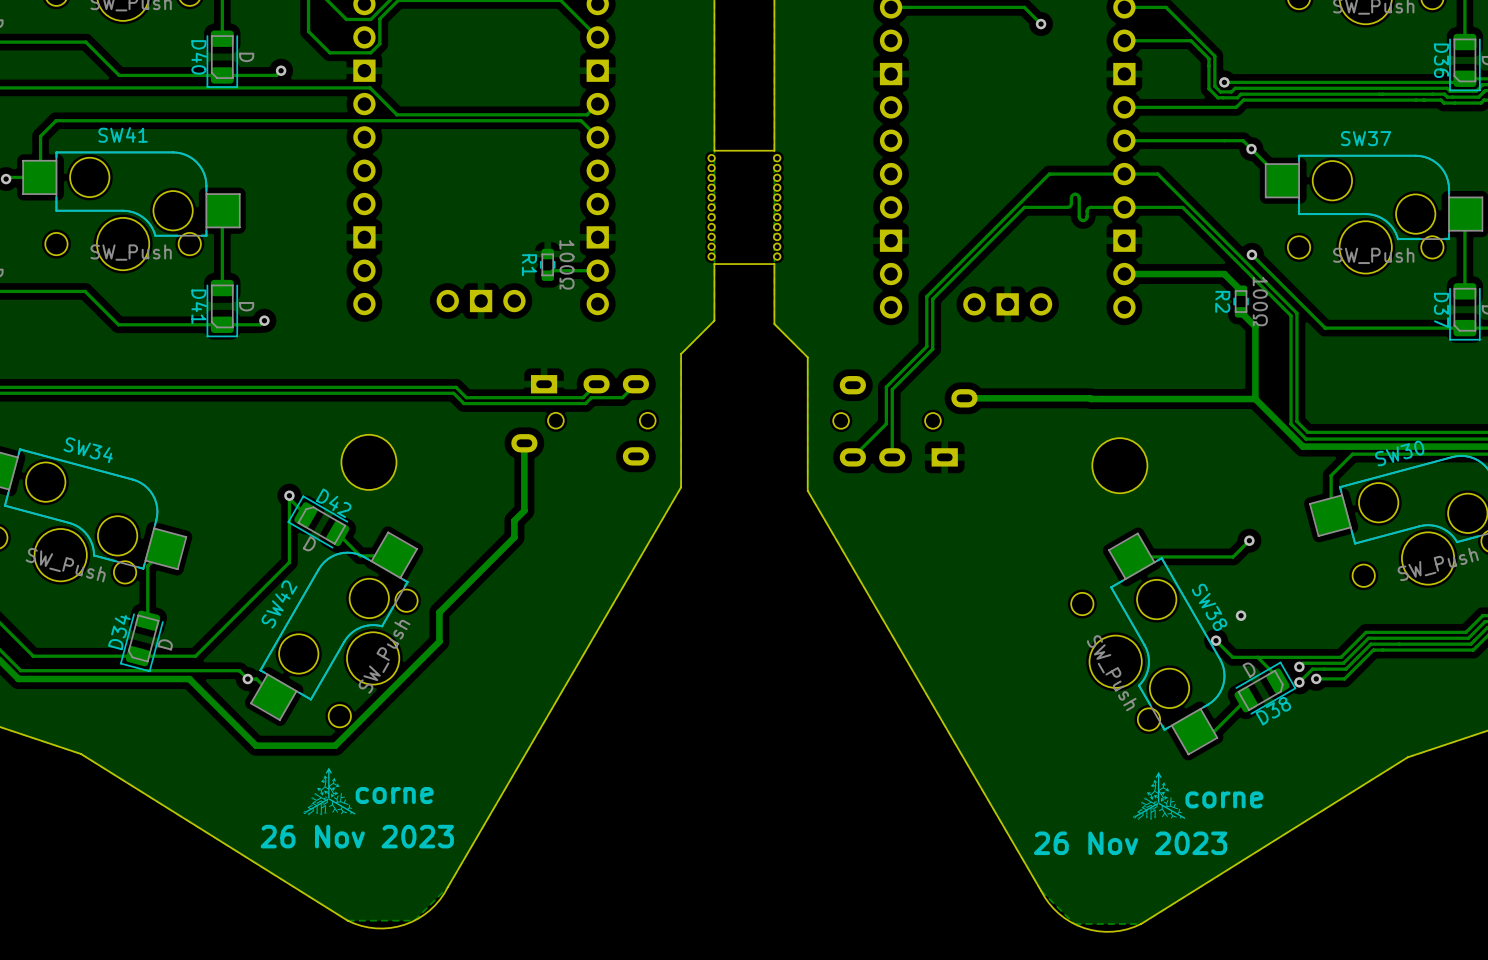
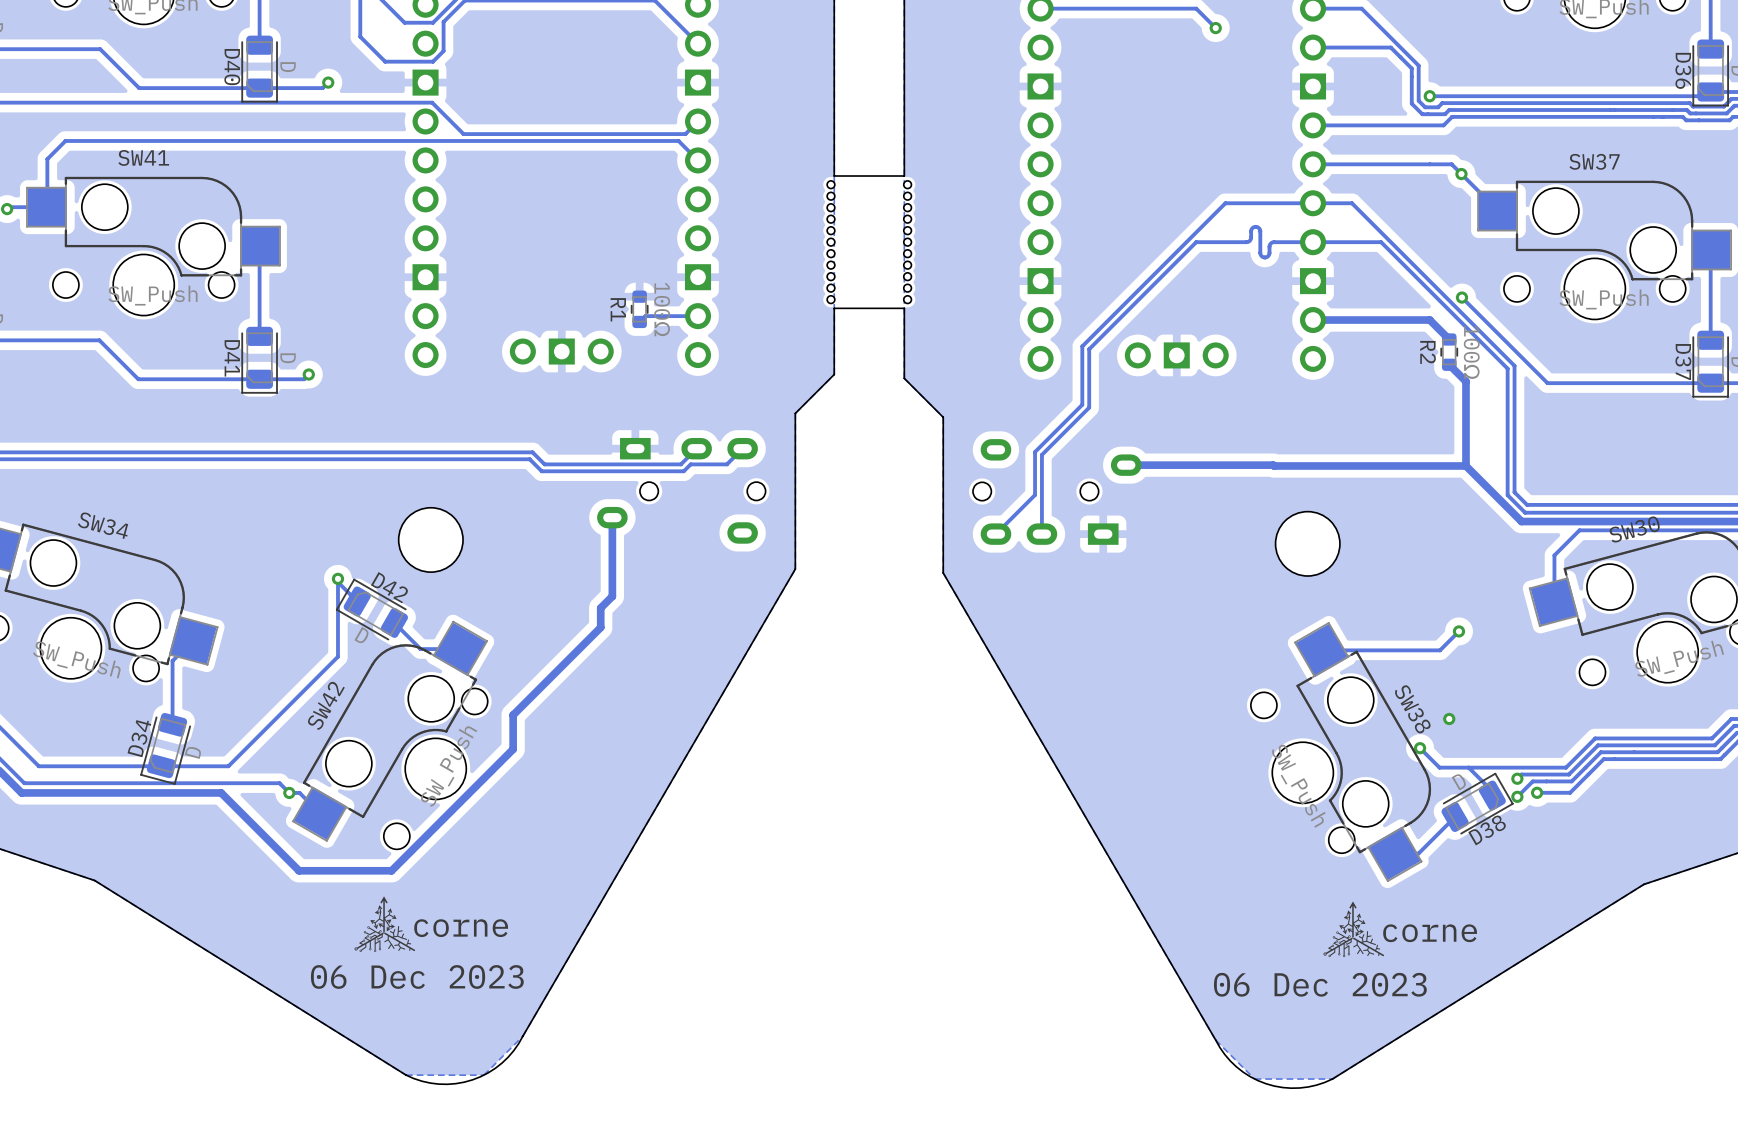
text: 26 Nov 2023 (357, 836) -> 06 Dec 2023 (417, 976)
text: 26 Nov 2023 (1130, 843) -> 06 Dec 2023 (1320, 984)

